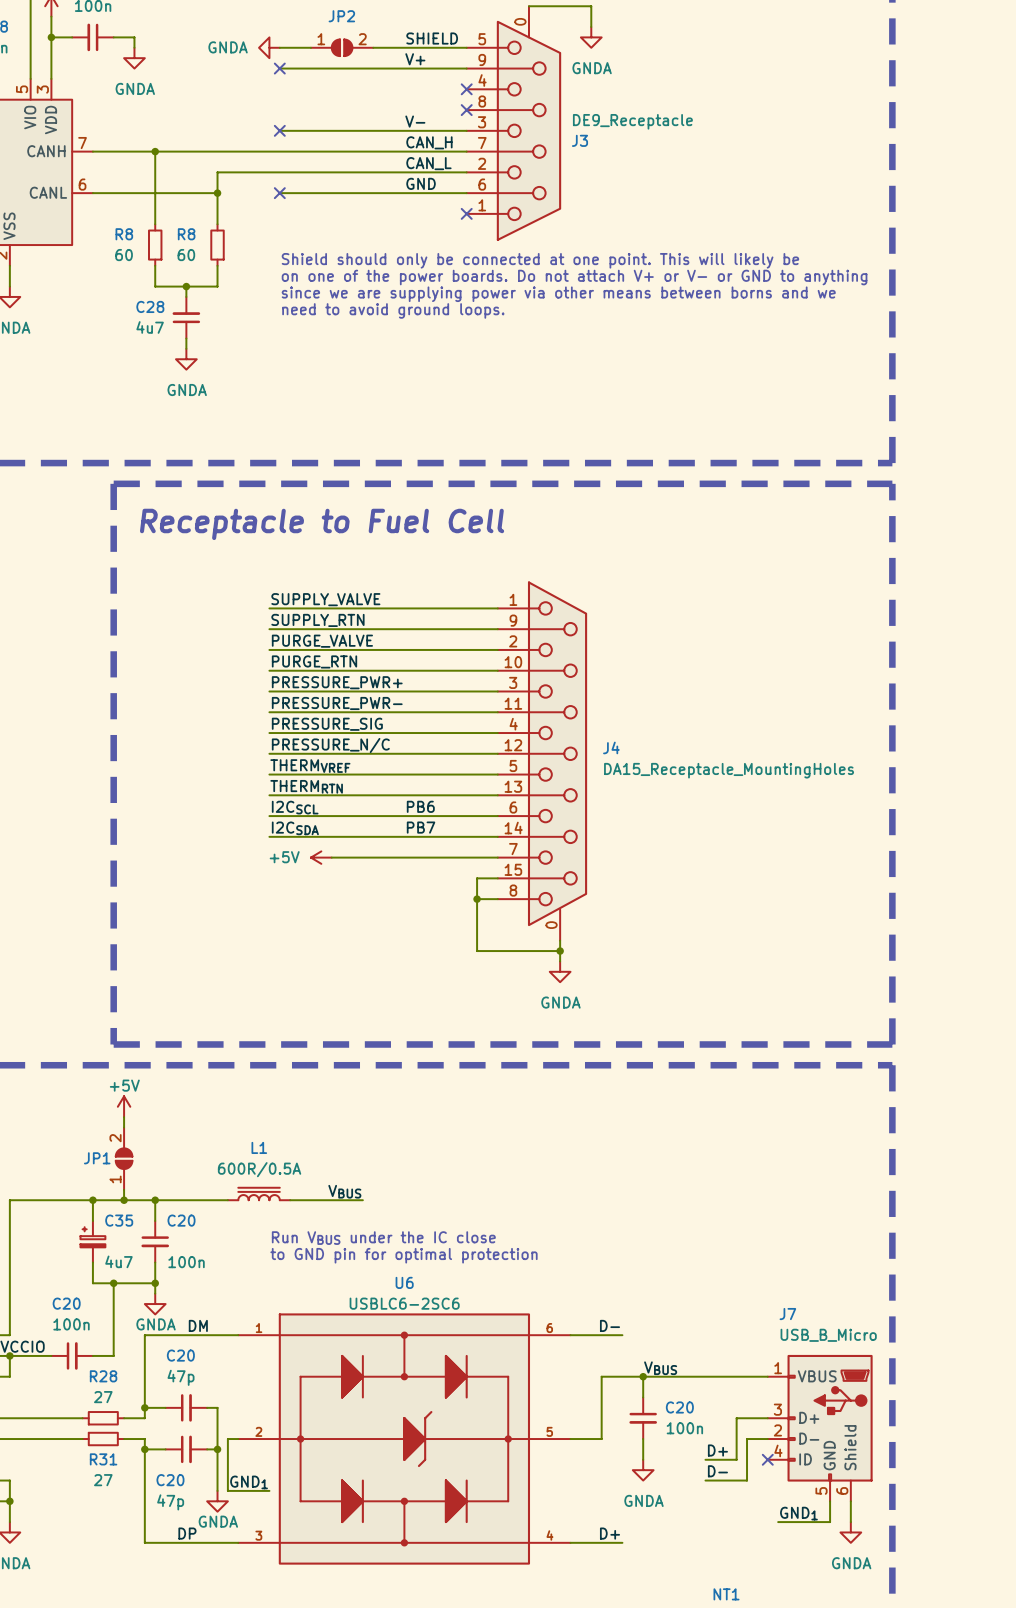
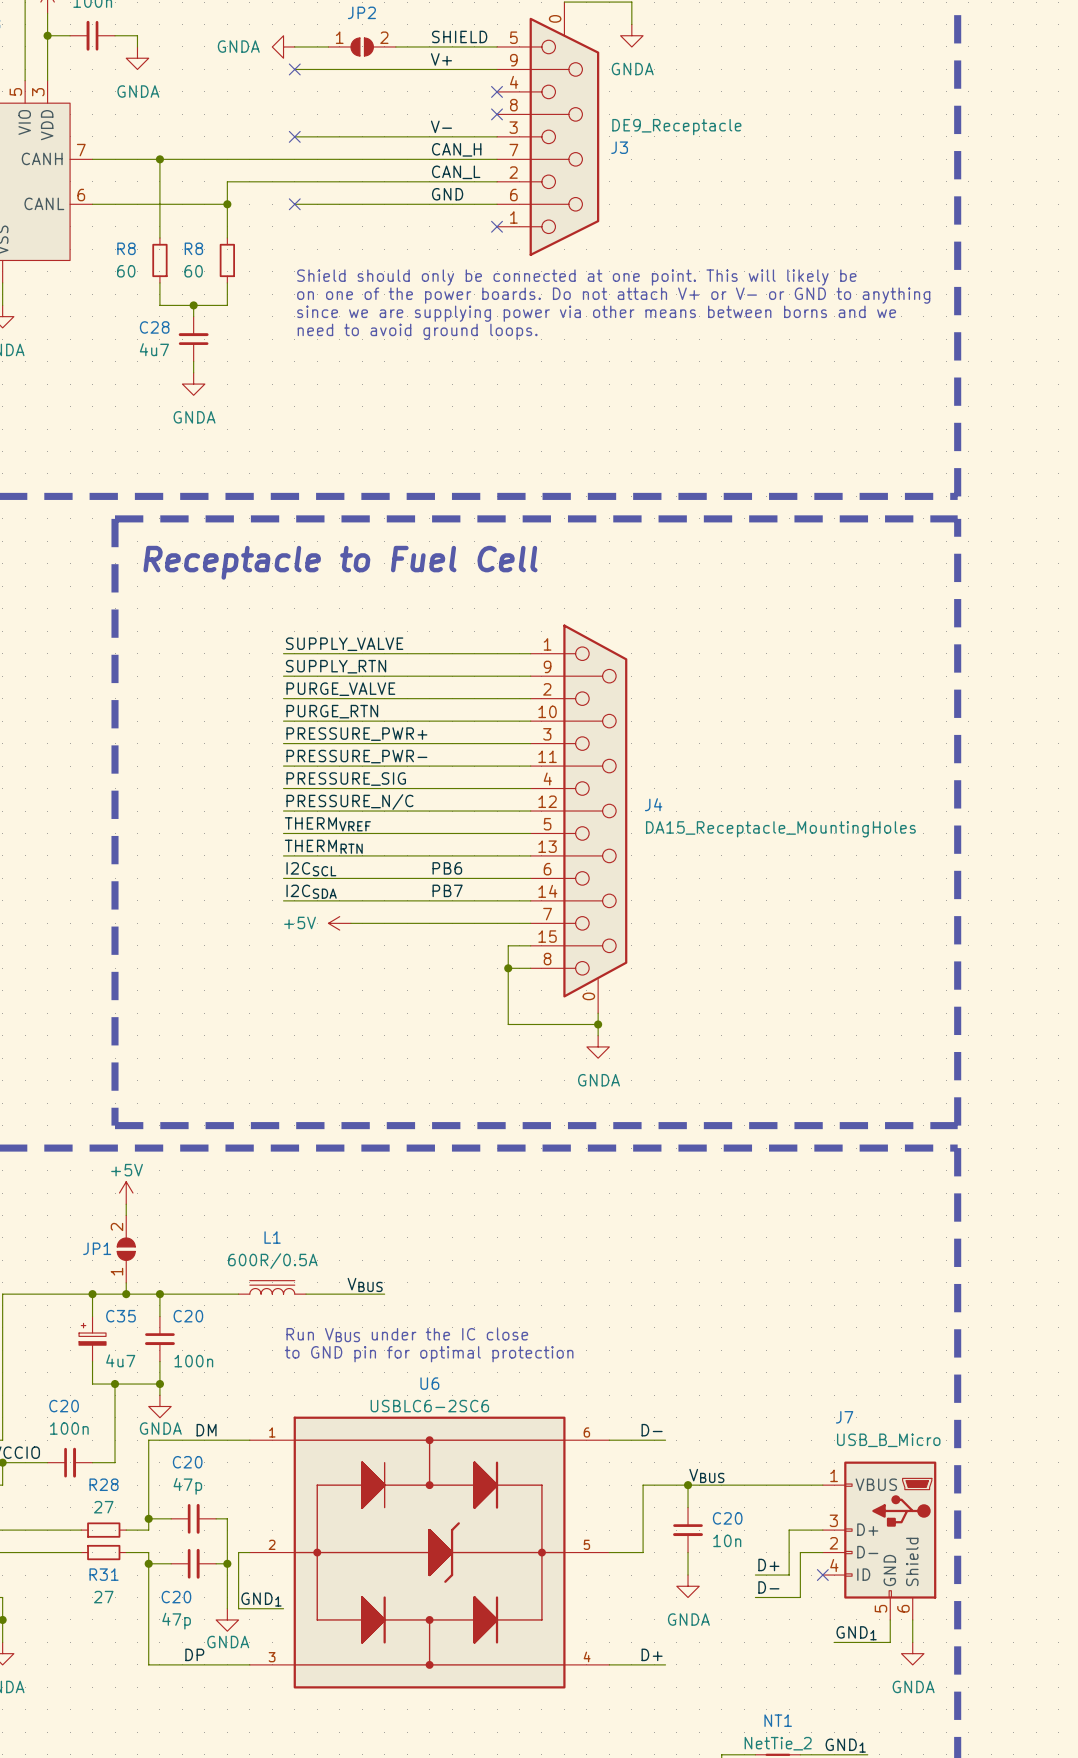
C20 value: 100n (684, 1428) -> 10n (727, 1540)

